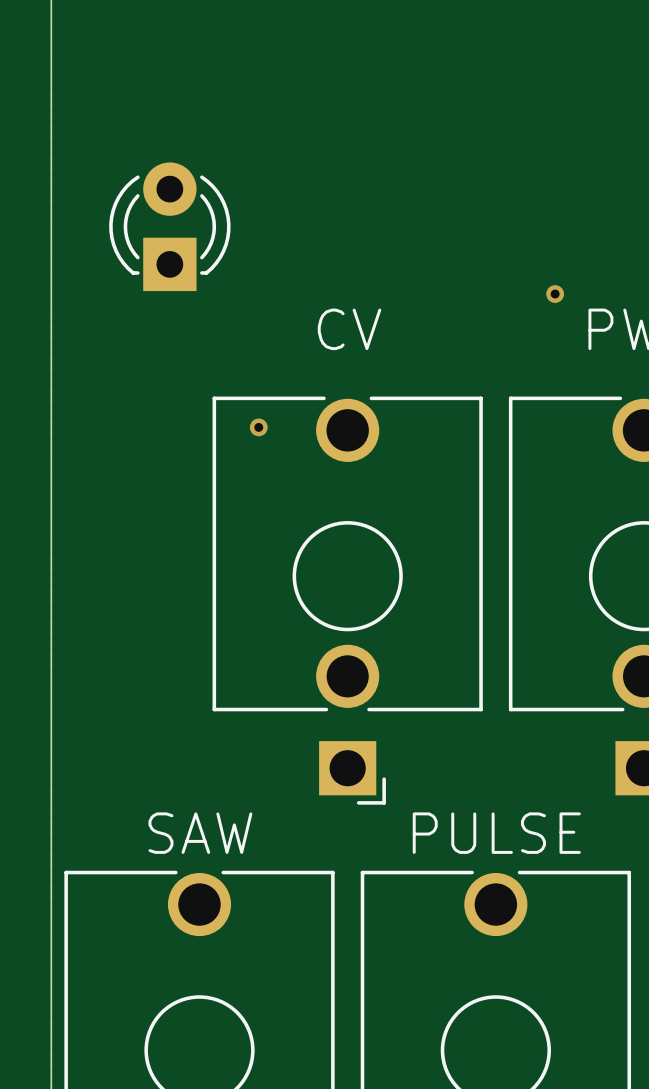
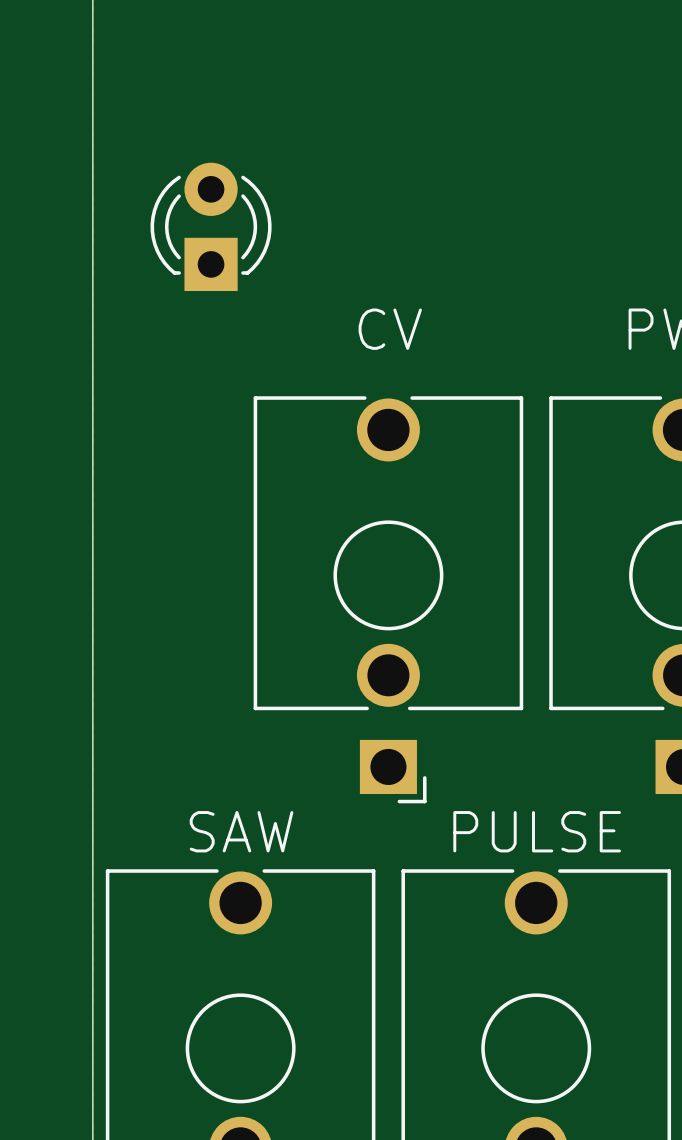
via: (555, 294) -> none
via: (258, 427) -> none

